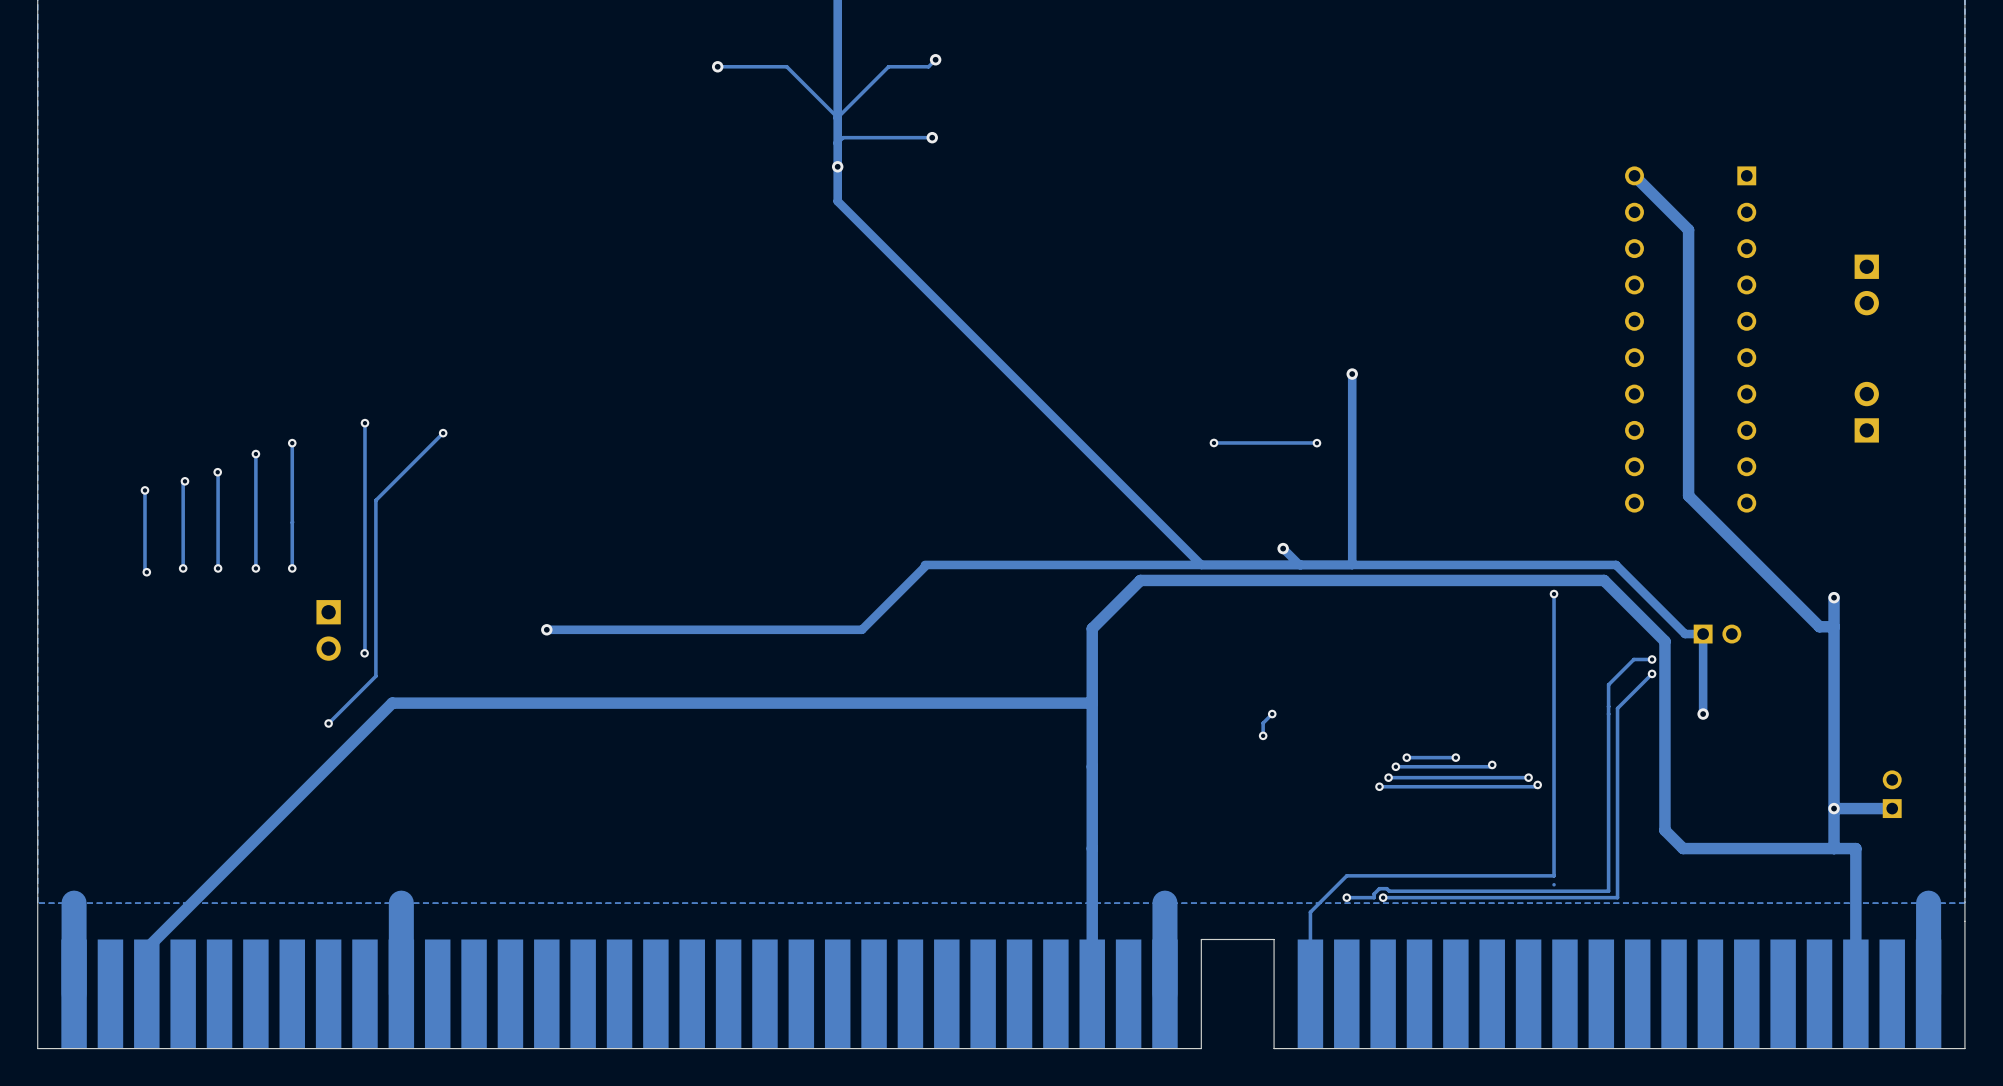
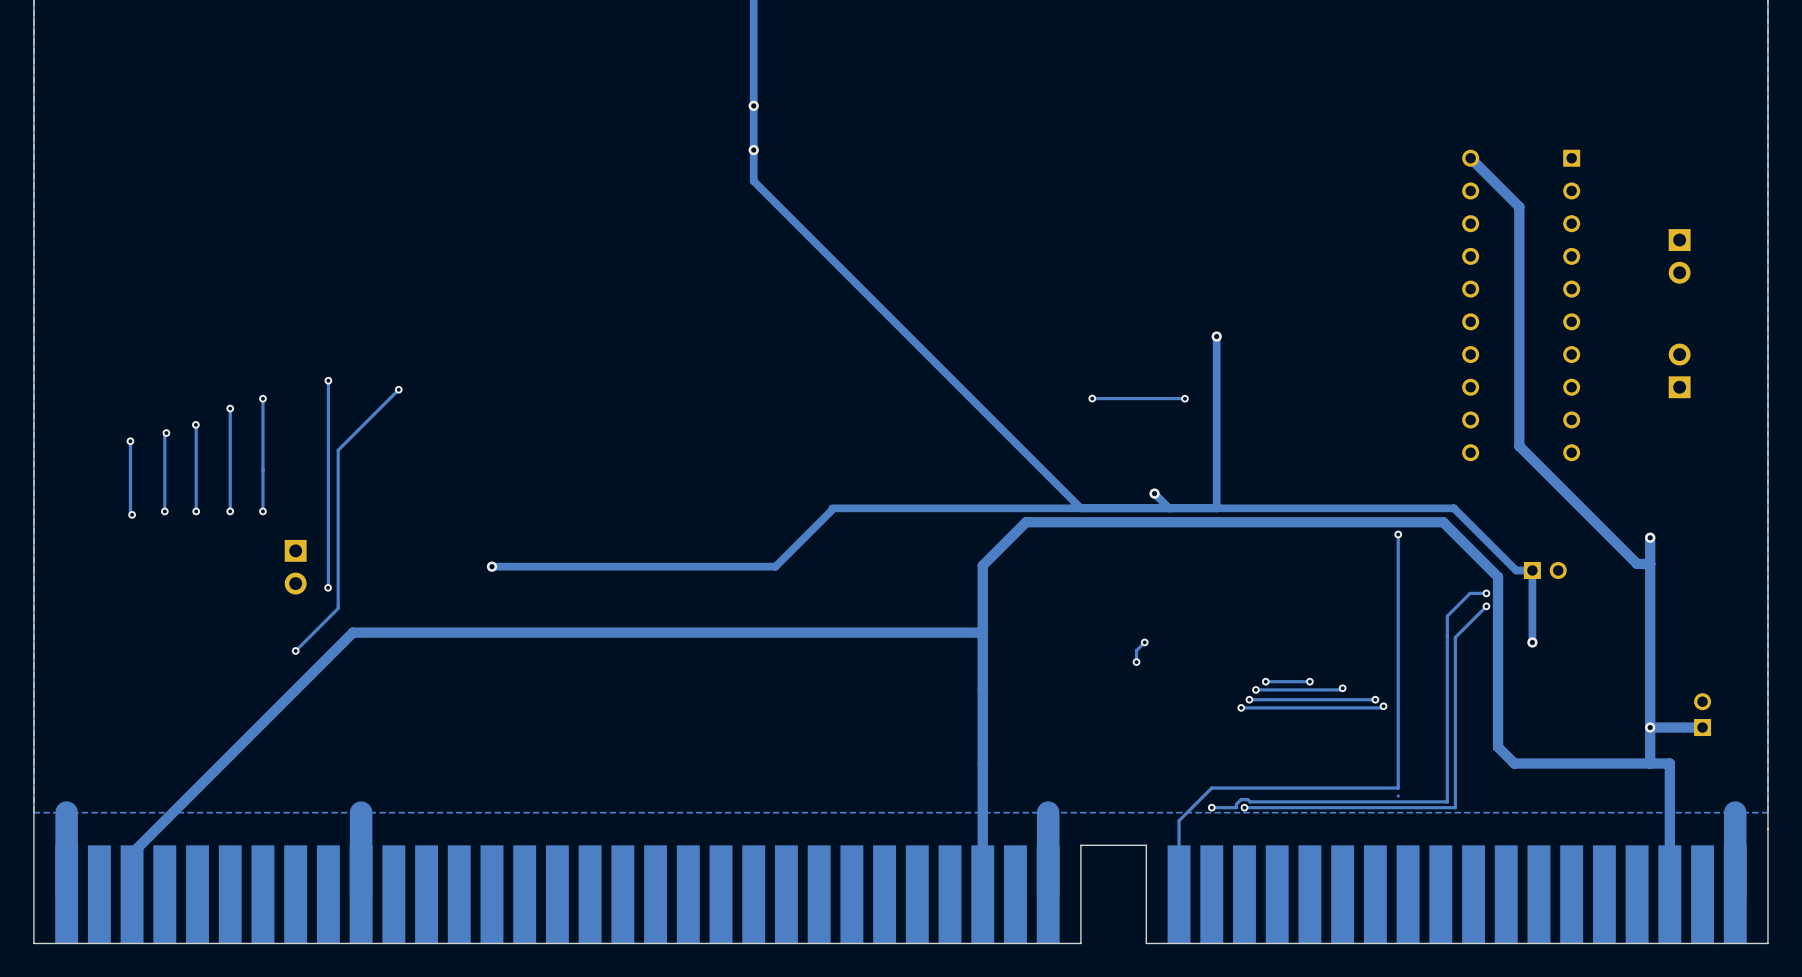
track: (935, 59) (928, 66) (888, 66) (837, 117) (786, 66) (717, 66) -> none
via: (935, 59) -> none
via: (717, 66) -> none
via: none -> (753, 105)
track: (932, 137) (843, 137) (837, 143) -> none
via: (932, 137) -> none

